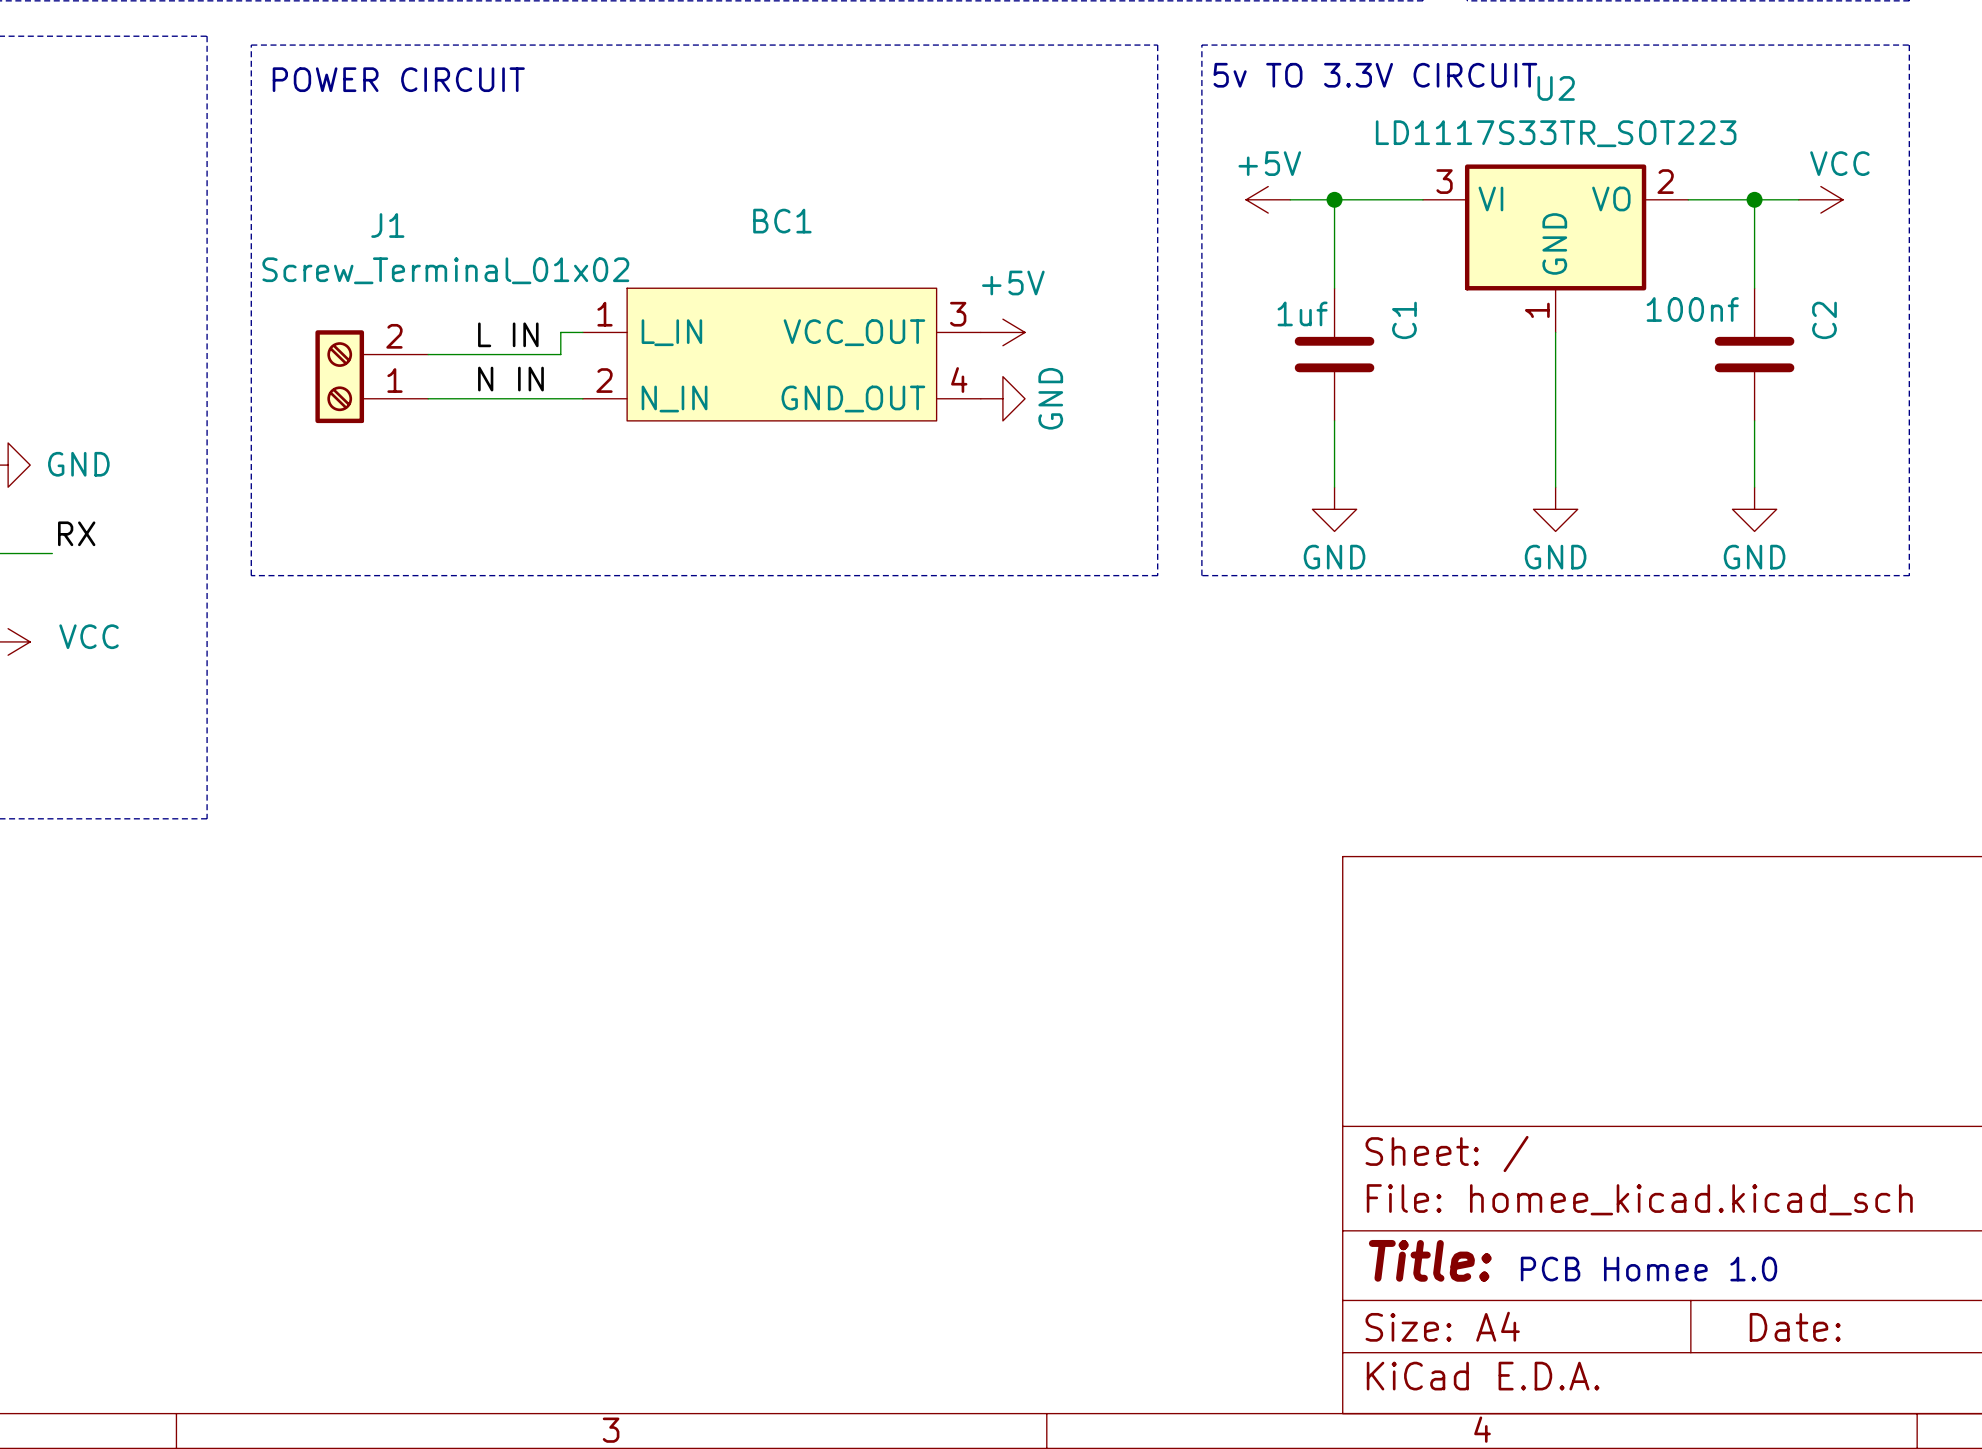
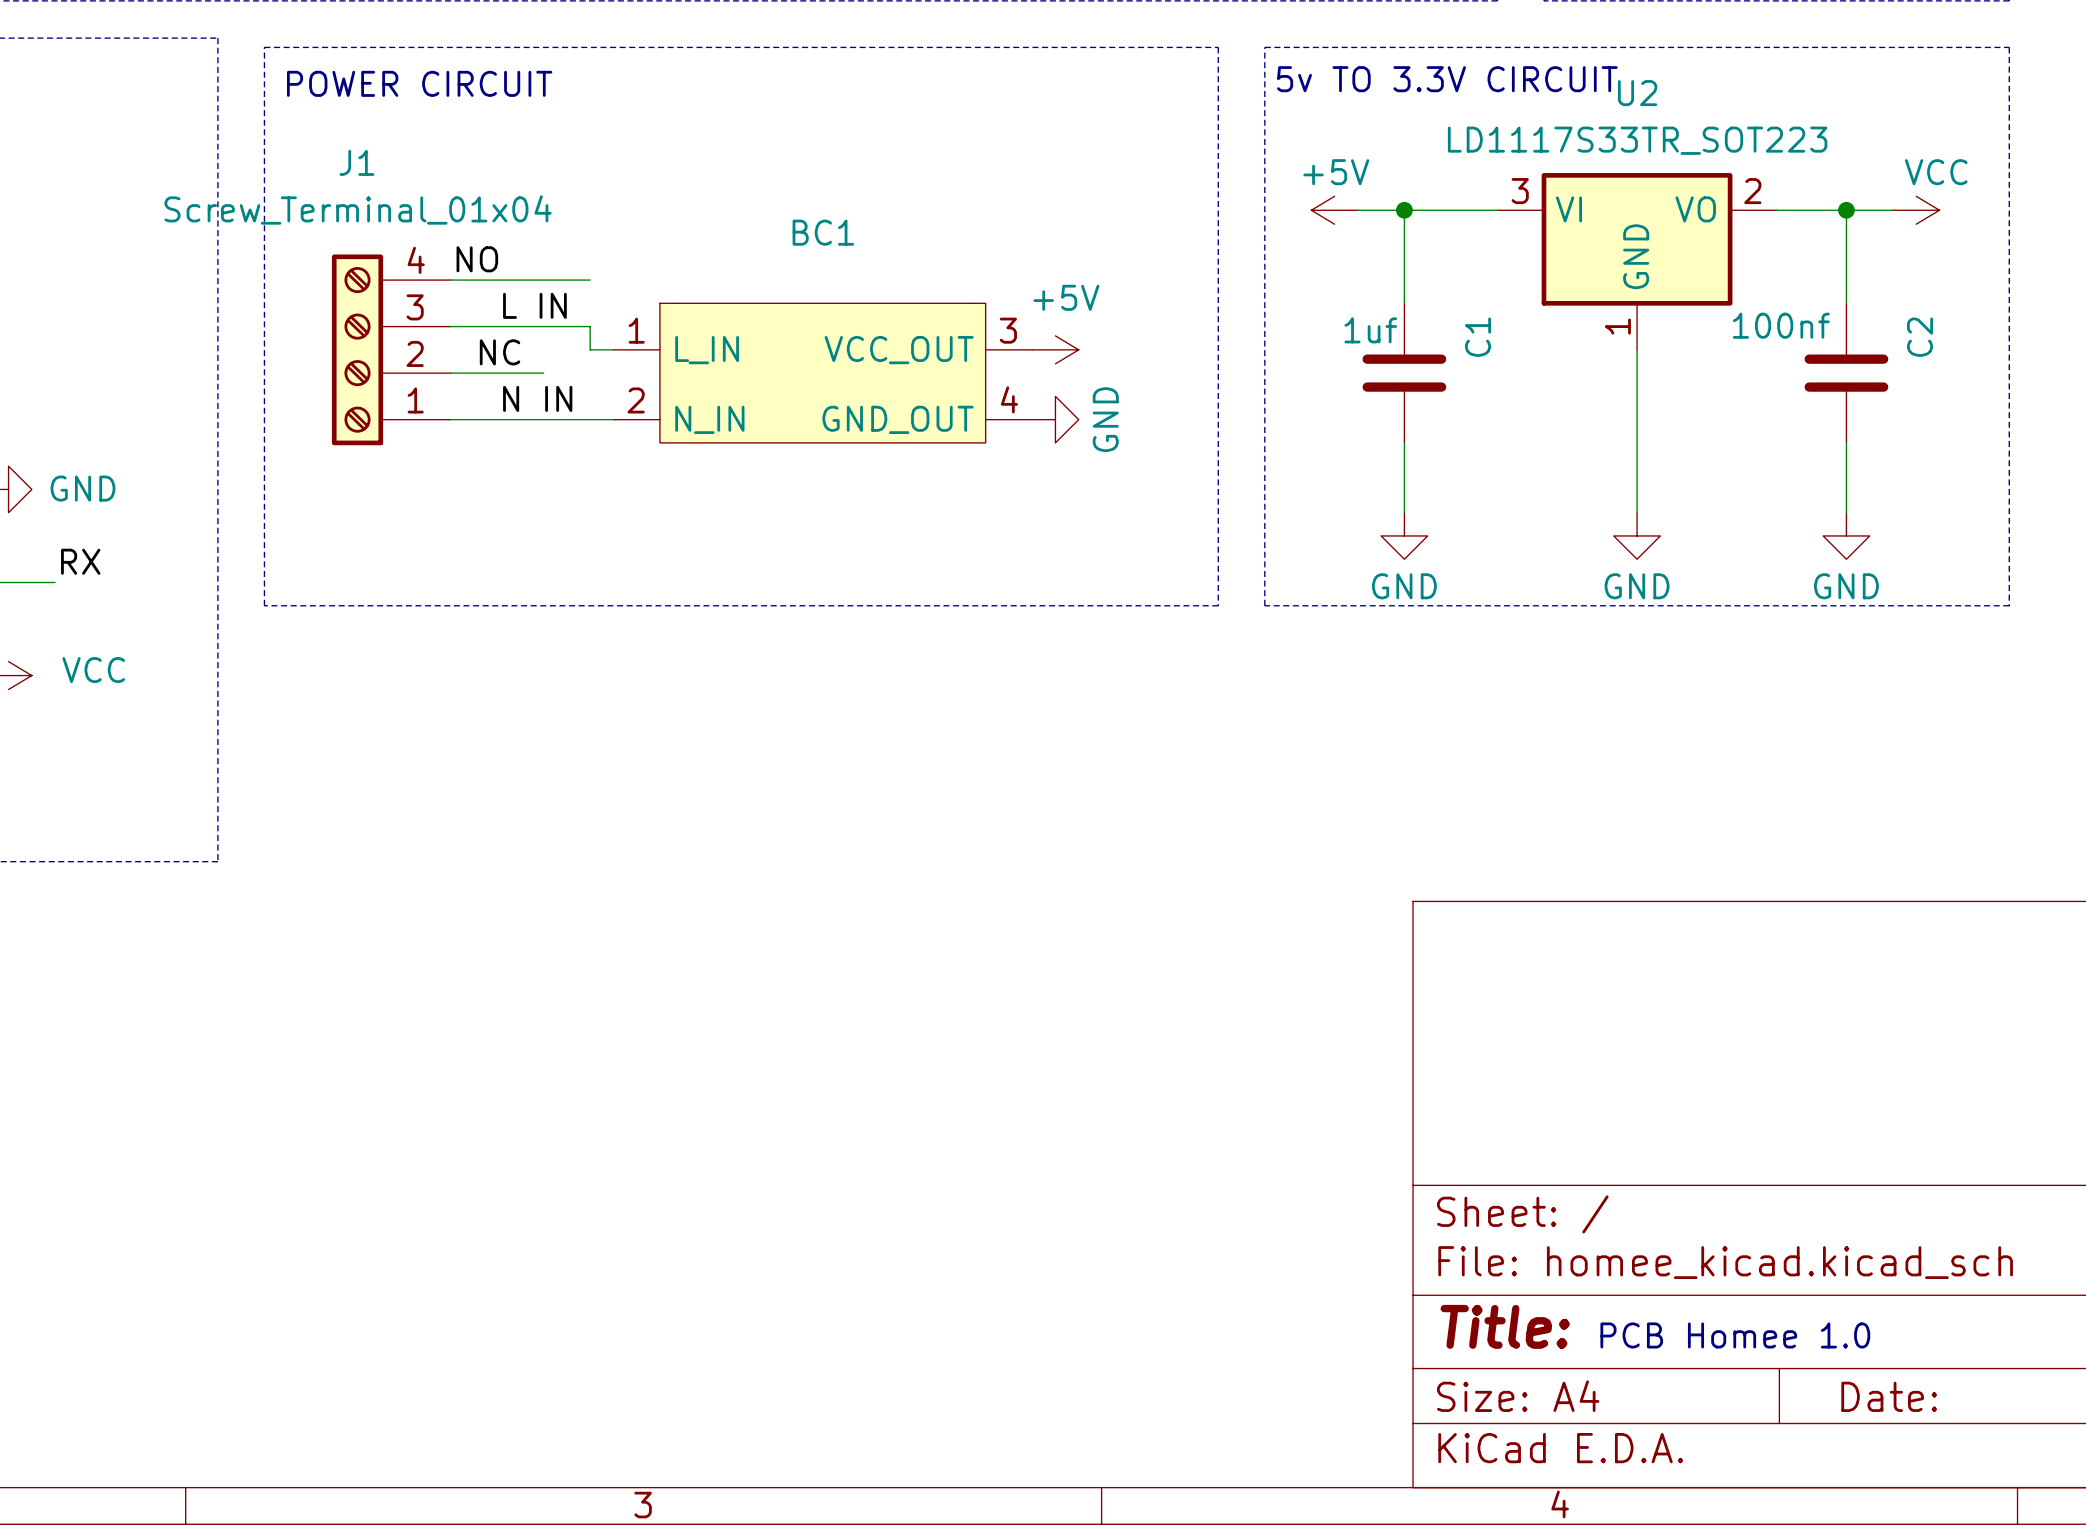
J1 name position: J1 (387, 225) -> J1 (356, 162)
label: none -> NO (477, 259)
wire: none -> (450, 280) (590, 280)
J1 value: Screw_Terminal_01x02 (445, 270) -> Screw_Terminal_01x04 (358, 209)
J1 symbol: [315, 330, 429, 424] -> [331, 254, 451, 446]
wire: (560, 332) (560, 354) (516, 354) -> (590, 349) (590, 326) (450, 326)
label: none -> NC (500, 352)
label position: L IN (508, 334) -> L IN (534, 305)

